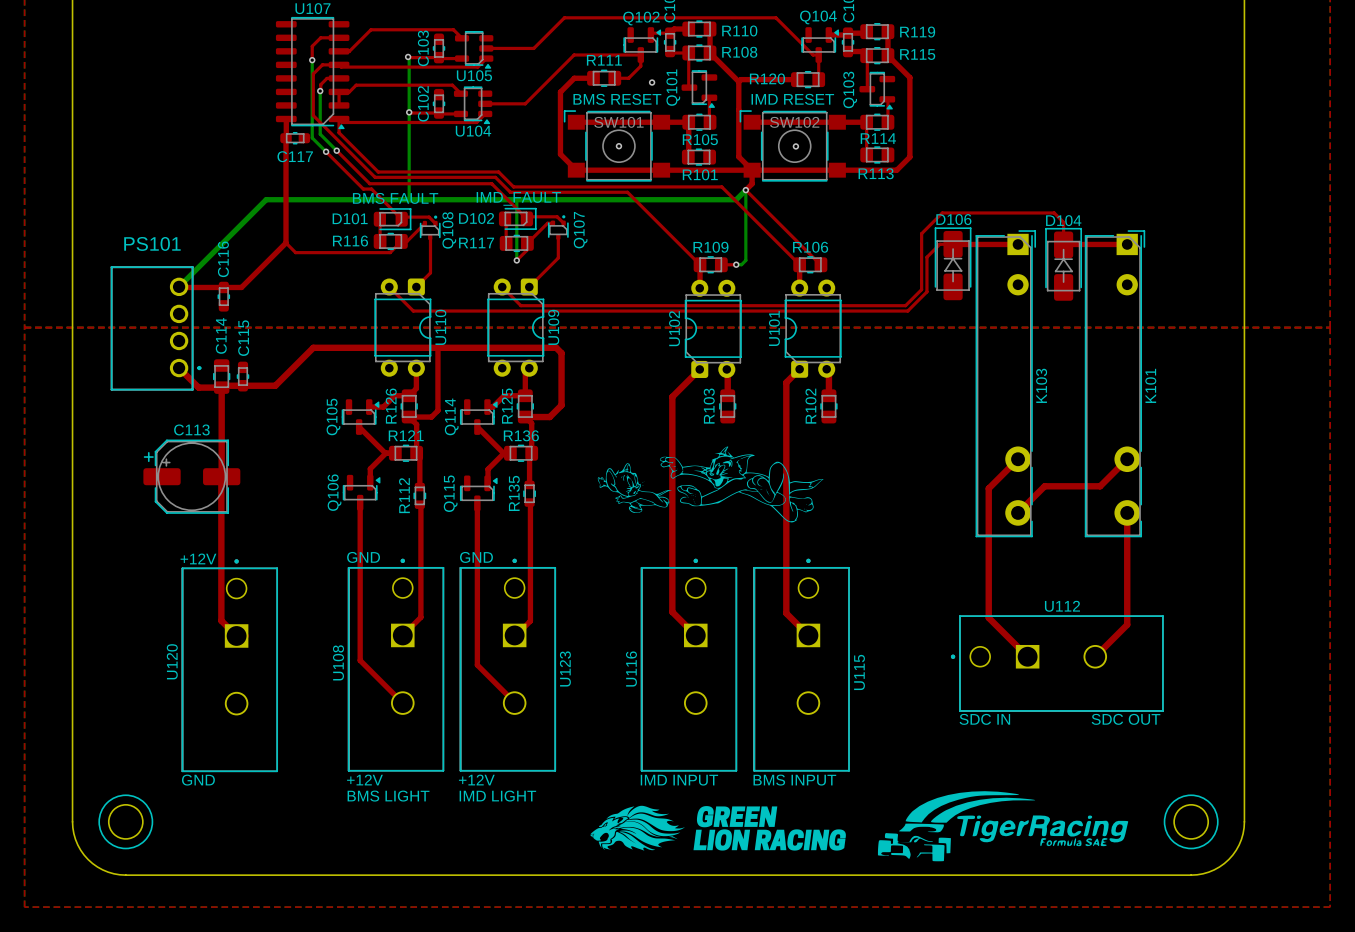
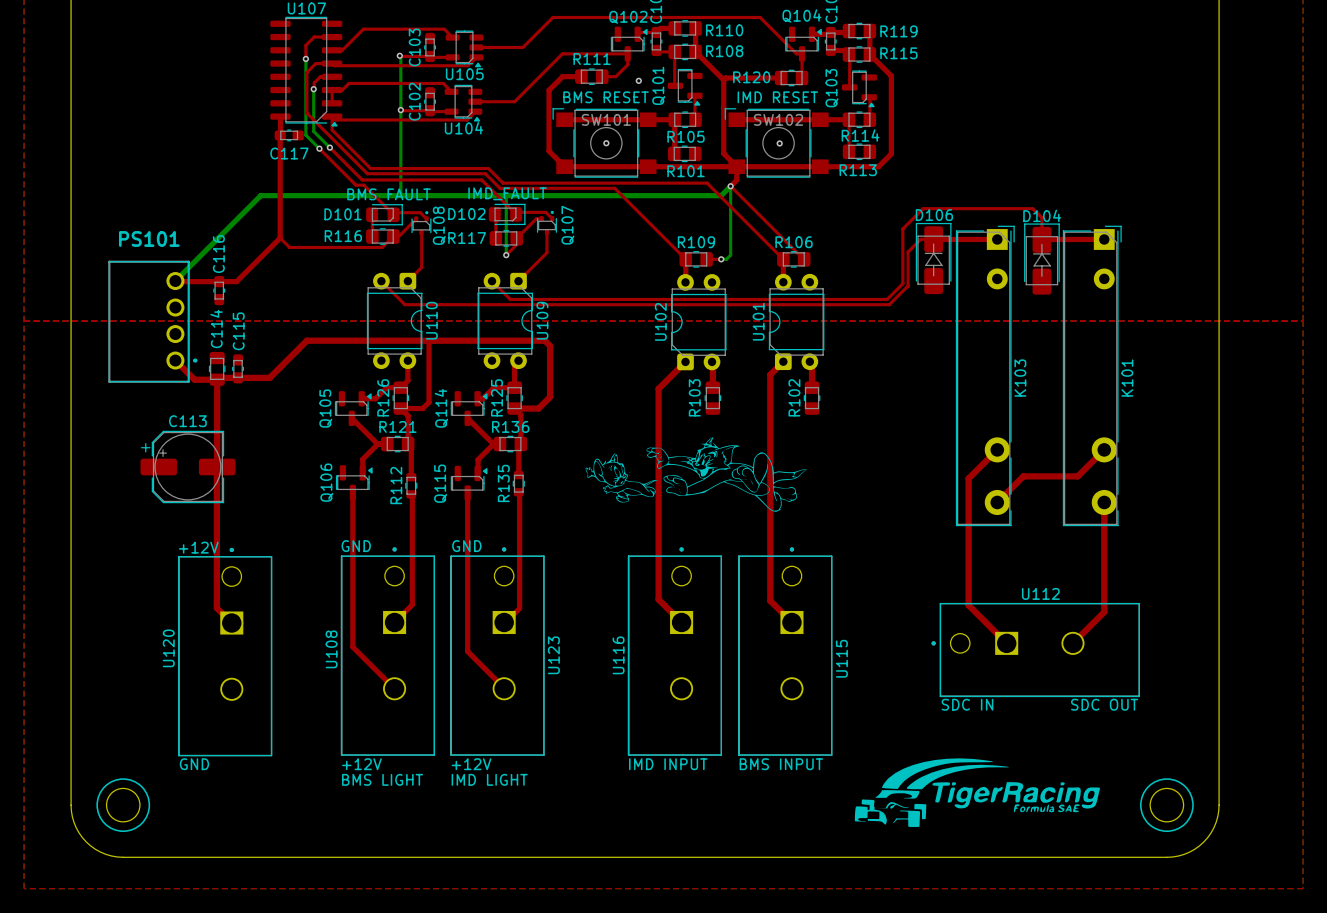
drawing: [590, 805, 846, 851] -> none
drawing position: (1016, 818) -> (990, 785)
drawing position: (914, 842) -> (890, 808)

